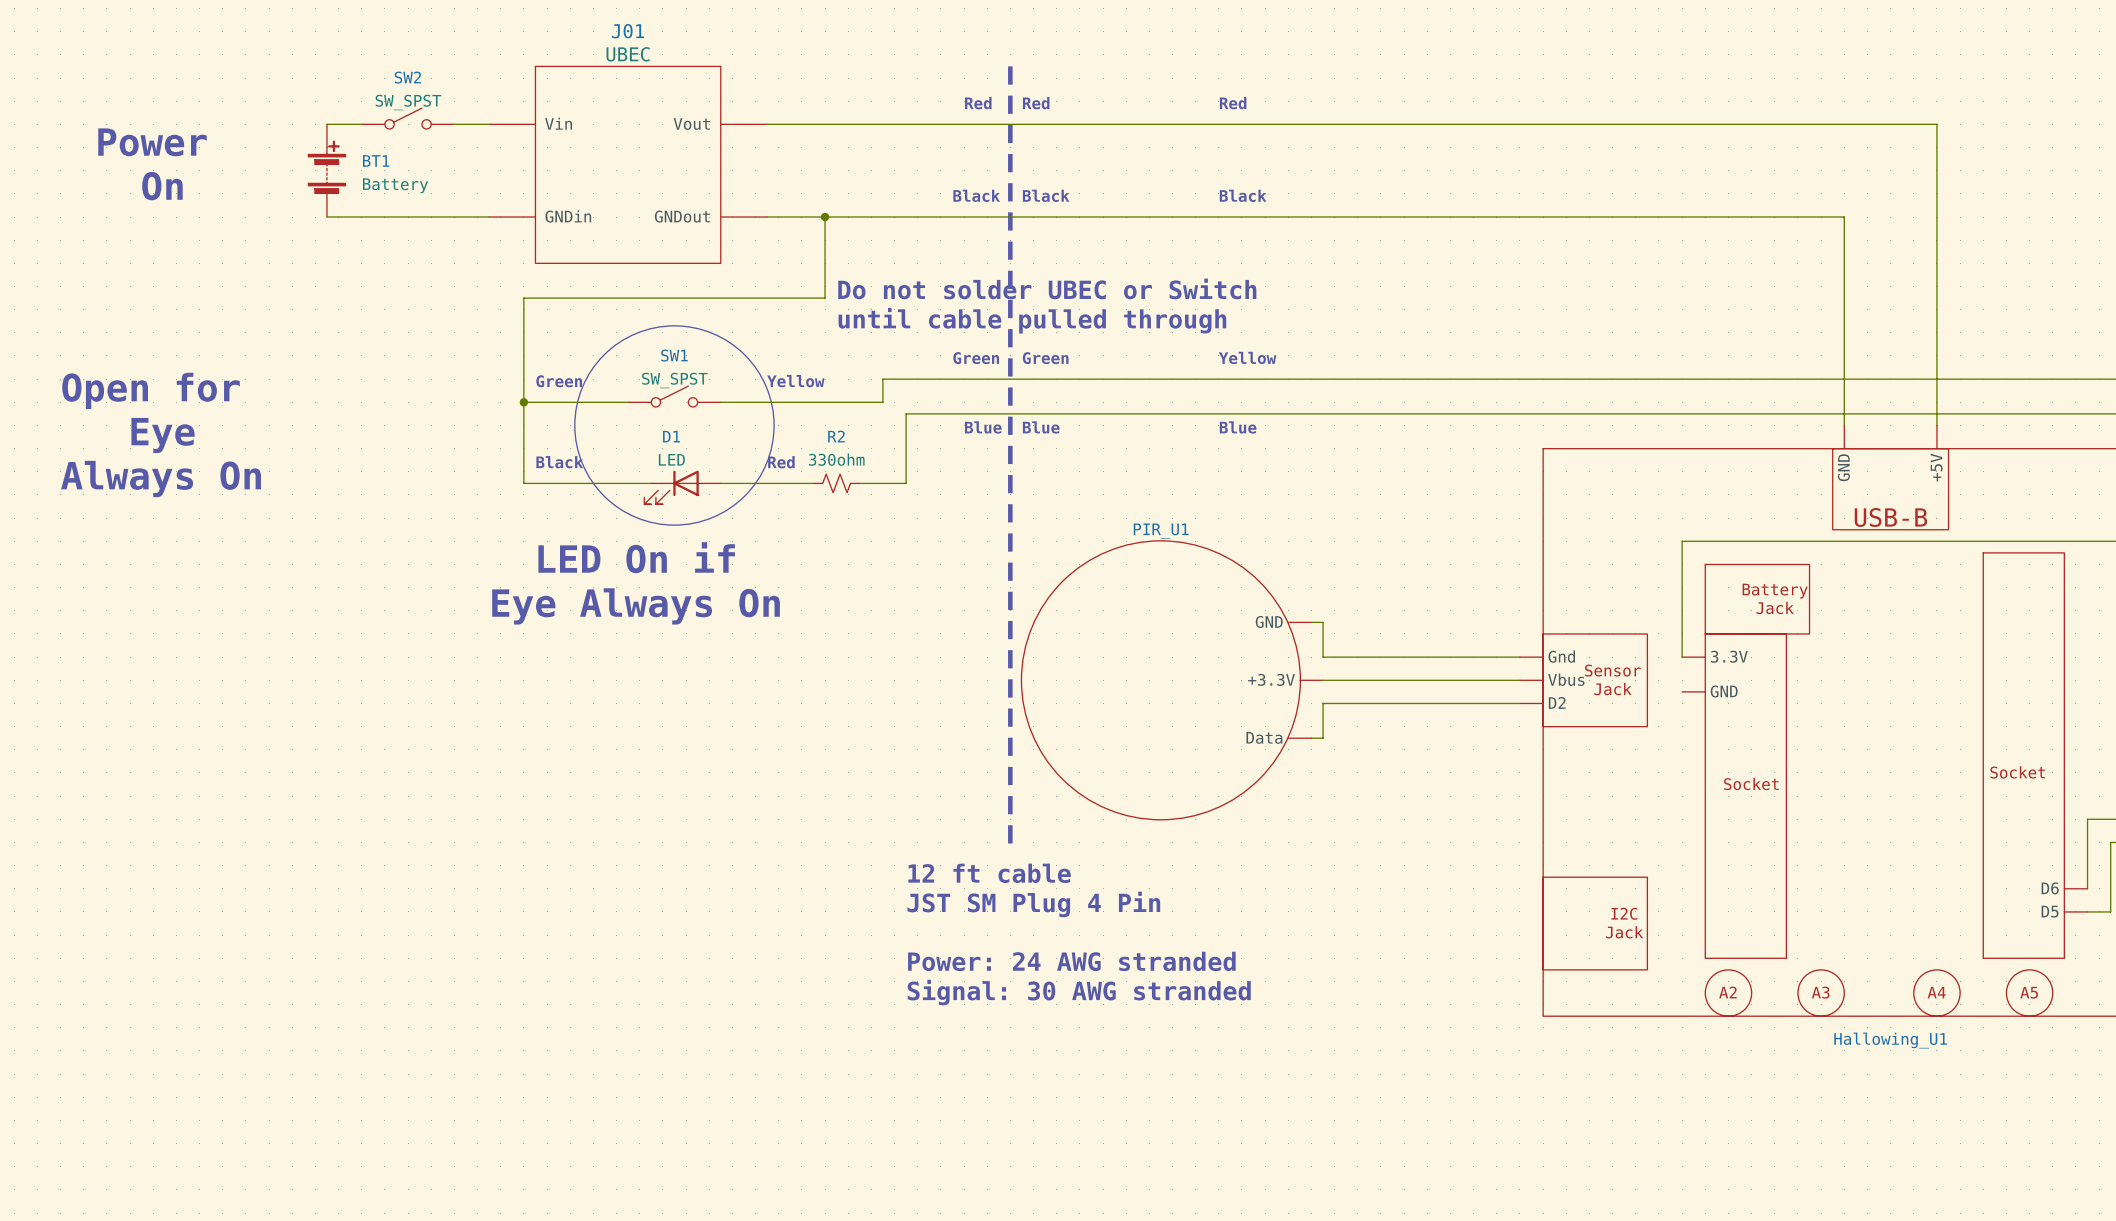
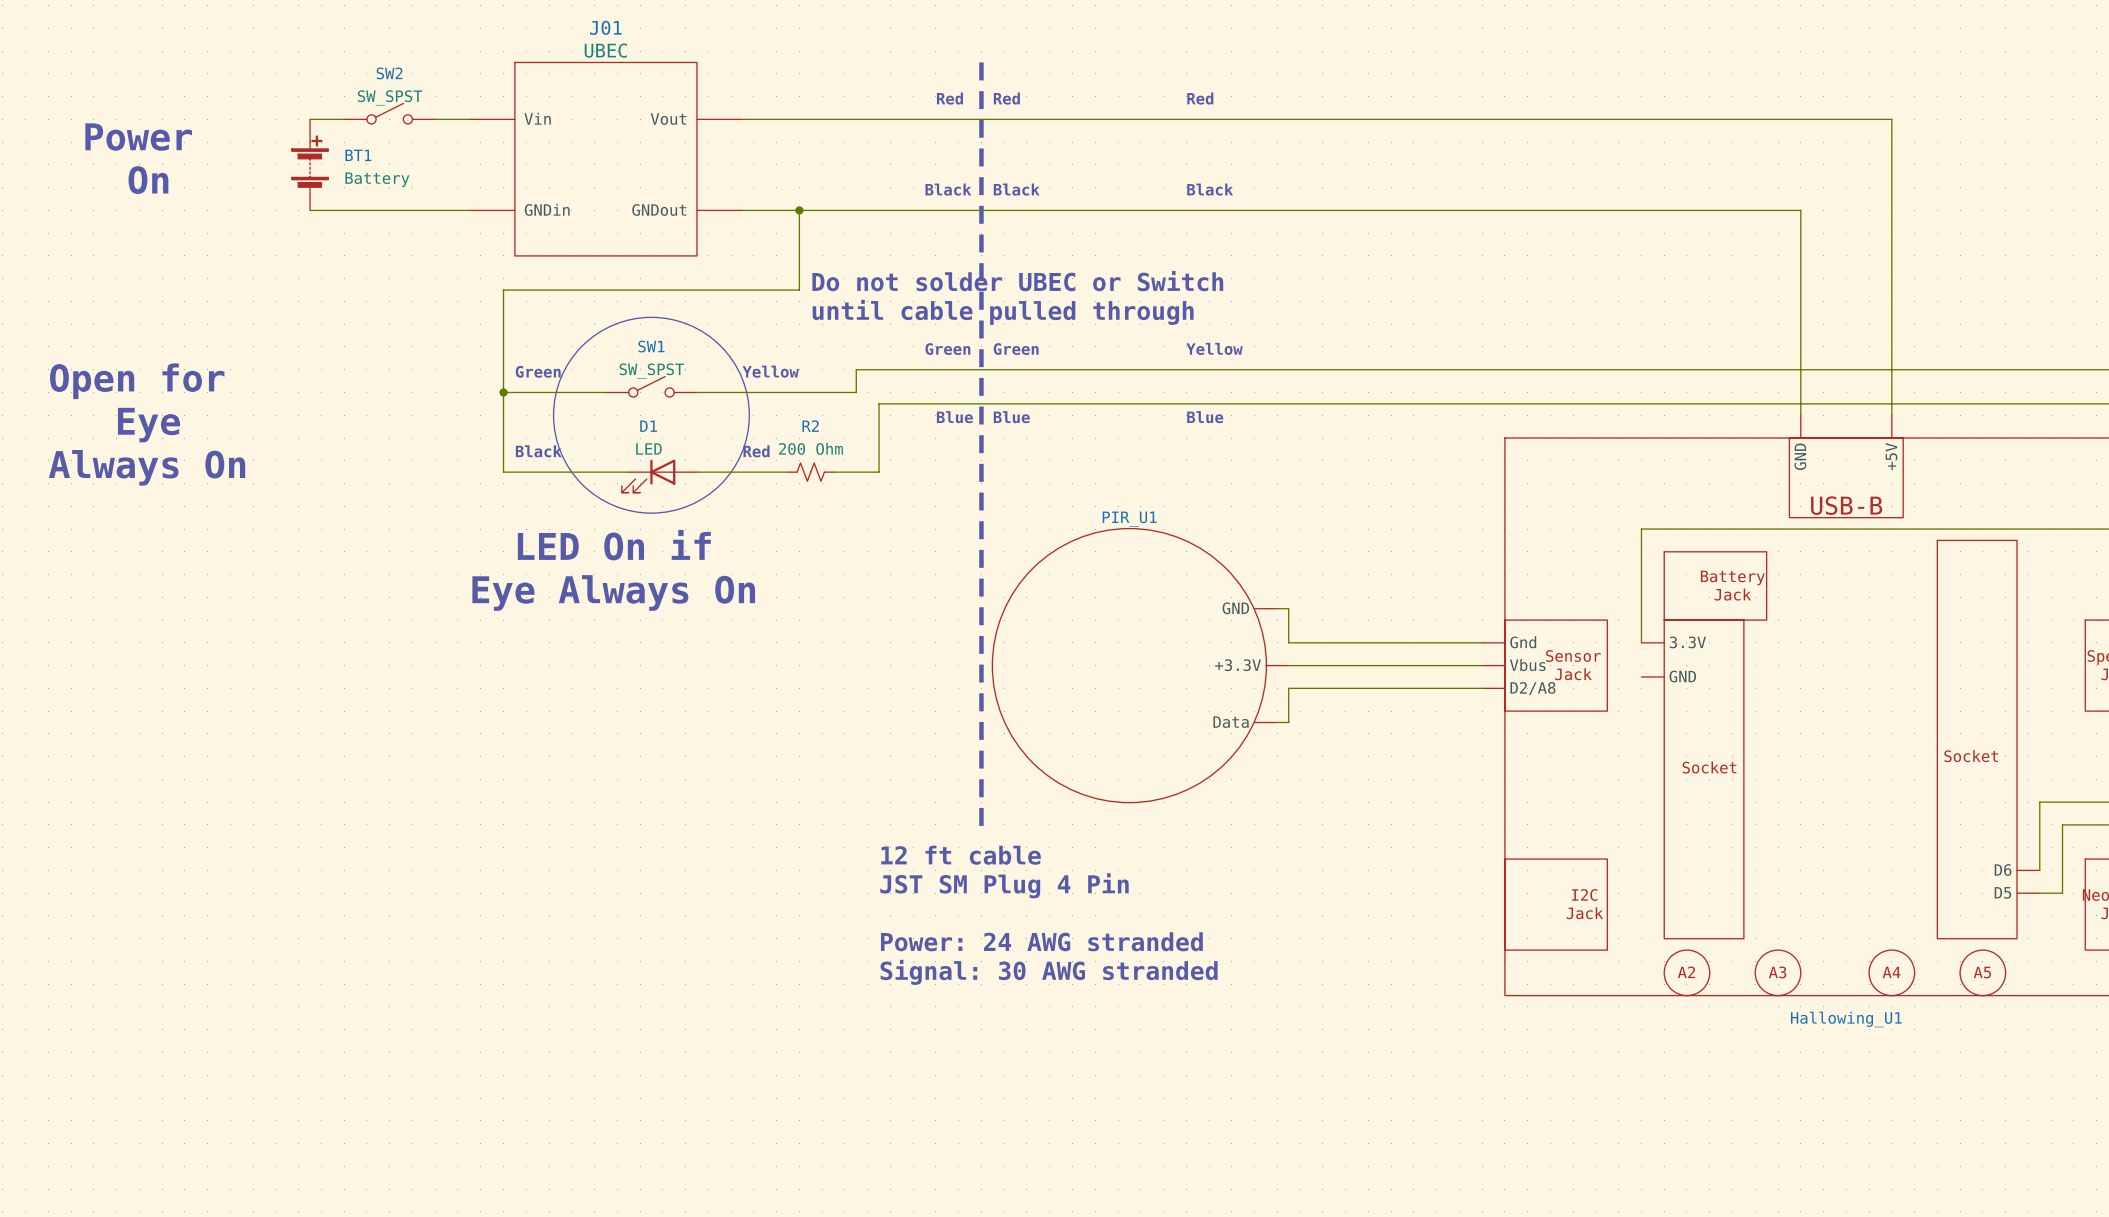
R2 value: 330ohm (836, 459) -> 200 Ohm (810, 448)
Hallowing_U1 pin name: D2 (1557, 702) -> D2/A8 (1532, 688)

